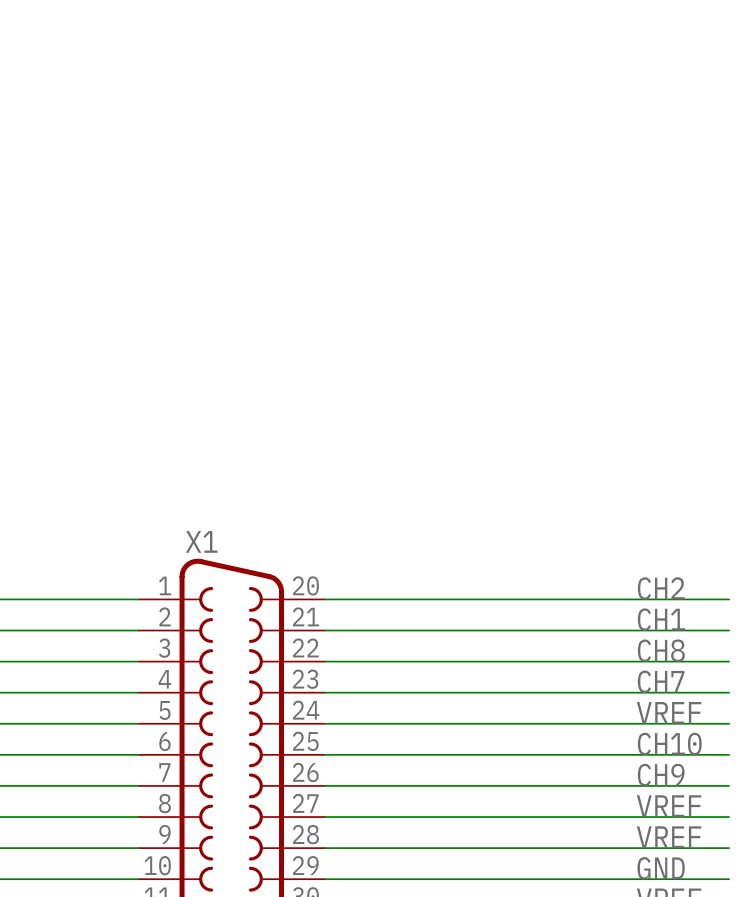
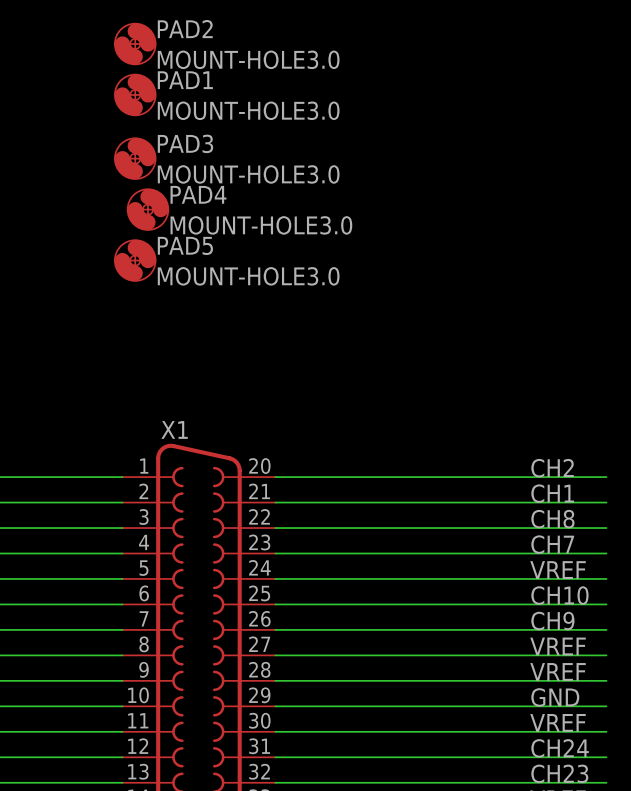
PAD2: none -> MOUNT-HOLE3.0 (135, 44)
PAD1: none -> MOUNT-HOLE3.0 (135, 94)
PAD3: none -> MOUNT-HOLE3.0 (135, 158)
PAD4: none -> MOUNT-HOLE3.0 (147, 209)
PAD5: none -> MOUNT-HOLE3.0 (135, 260)

